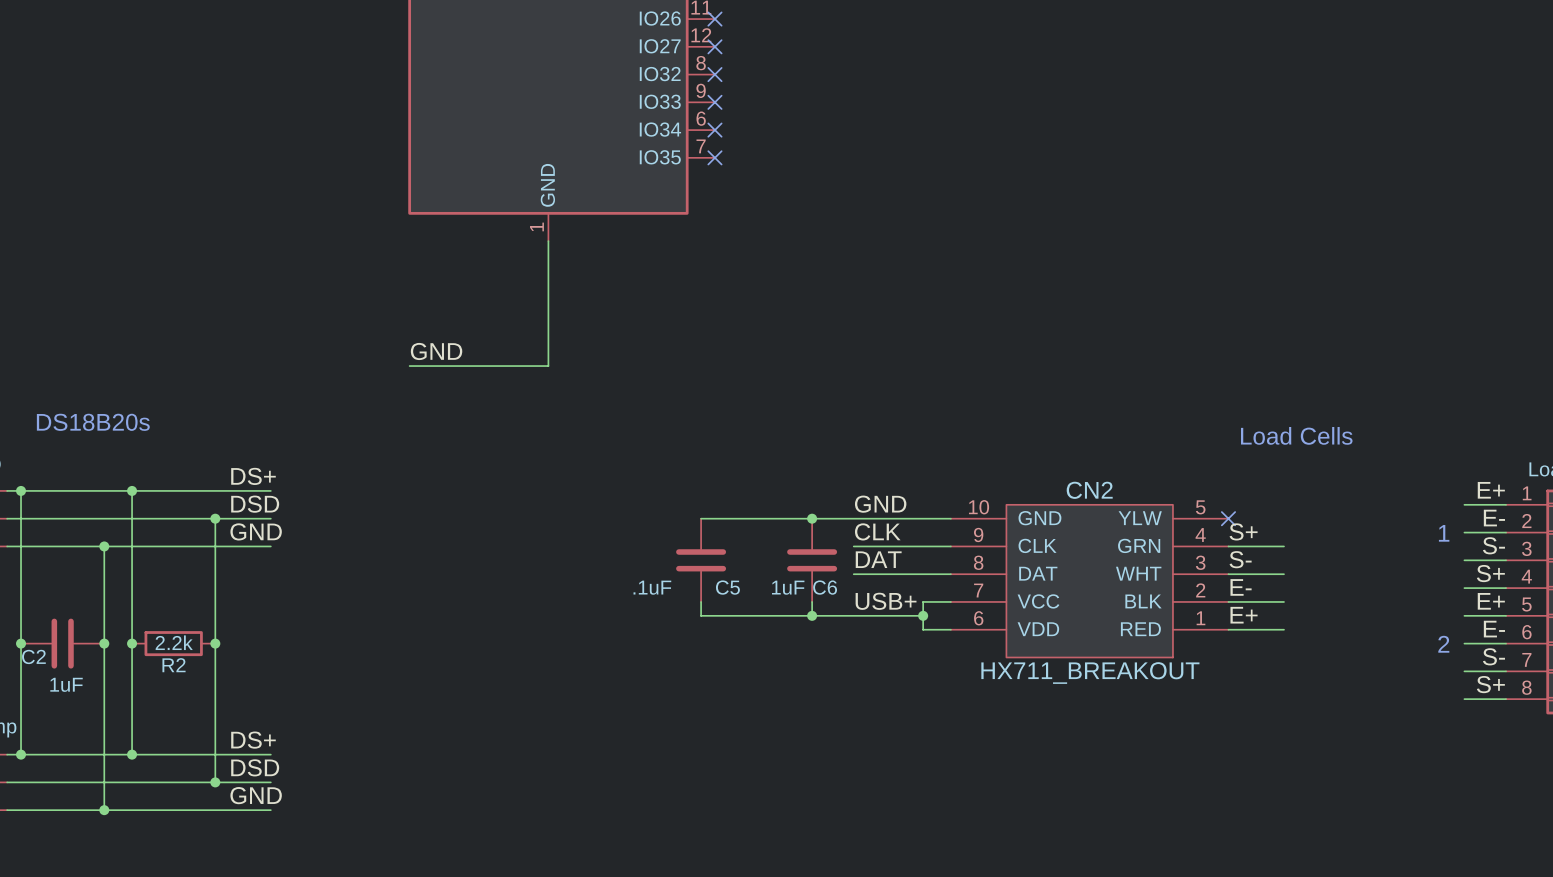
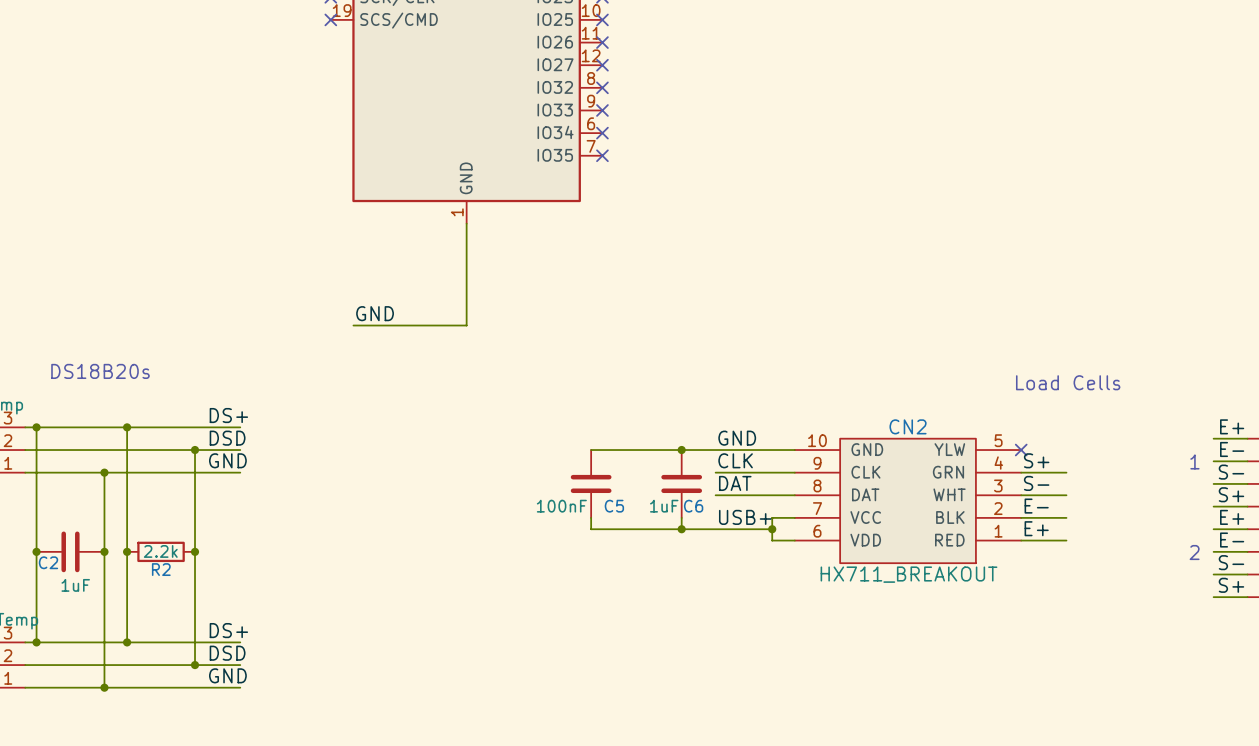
C5 value: .1uF (652, 587) -> 100nF (561, 506)

